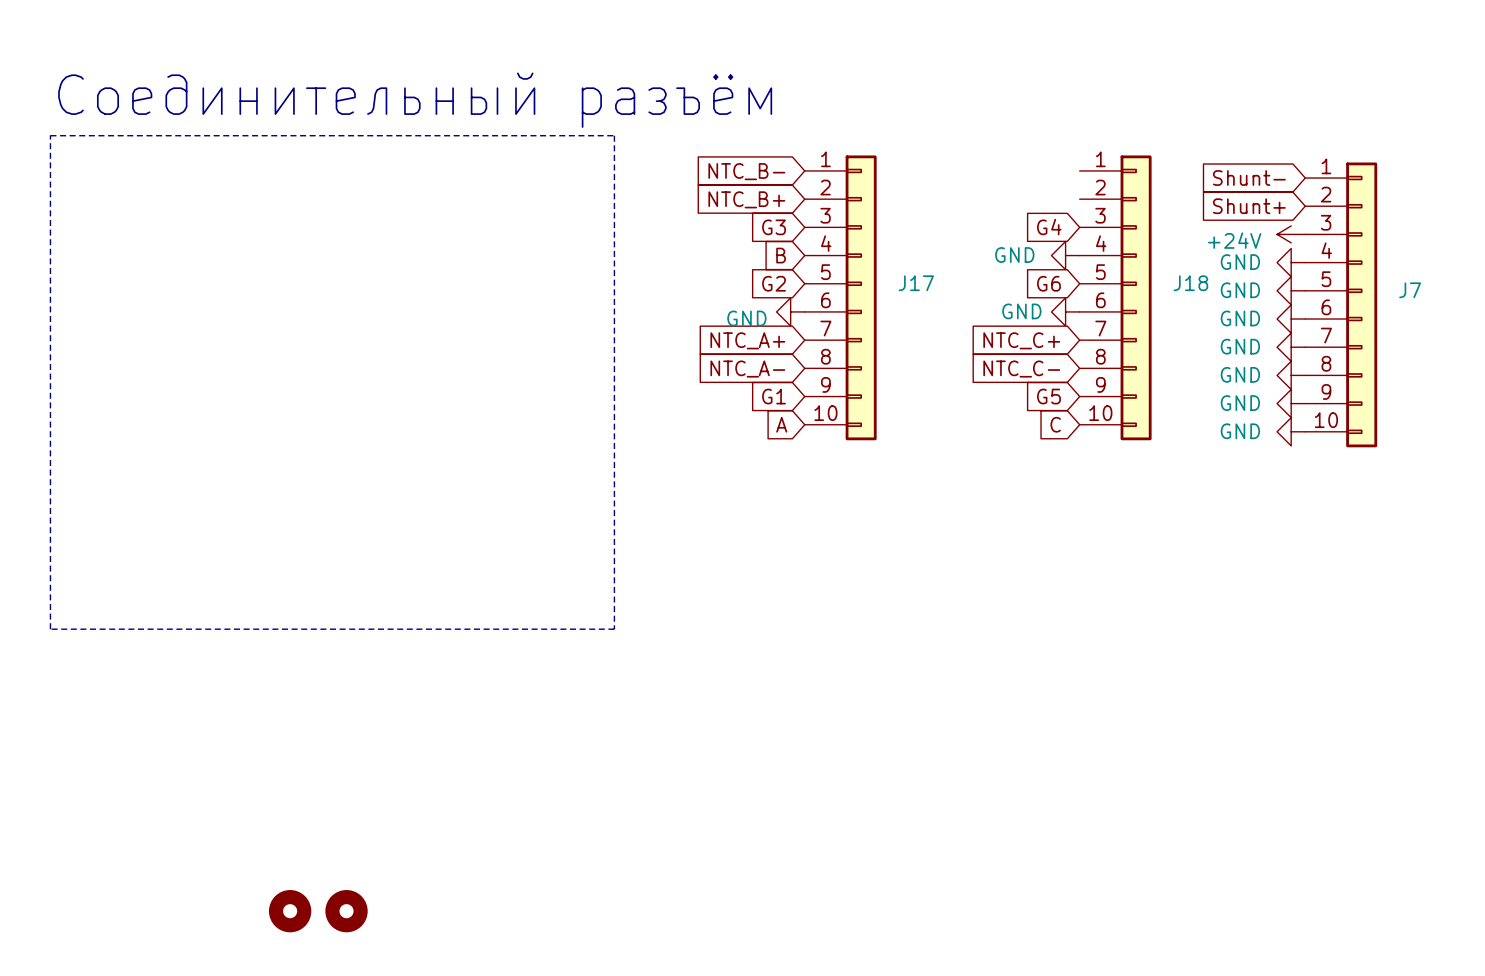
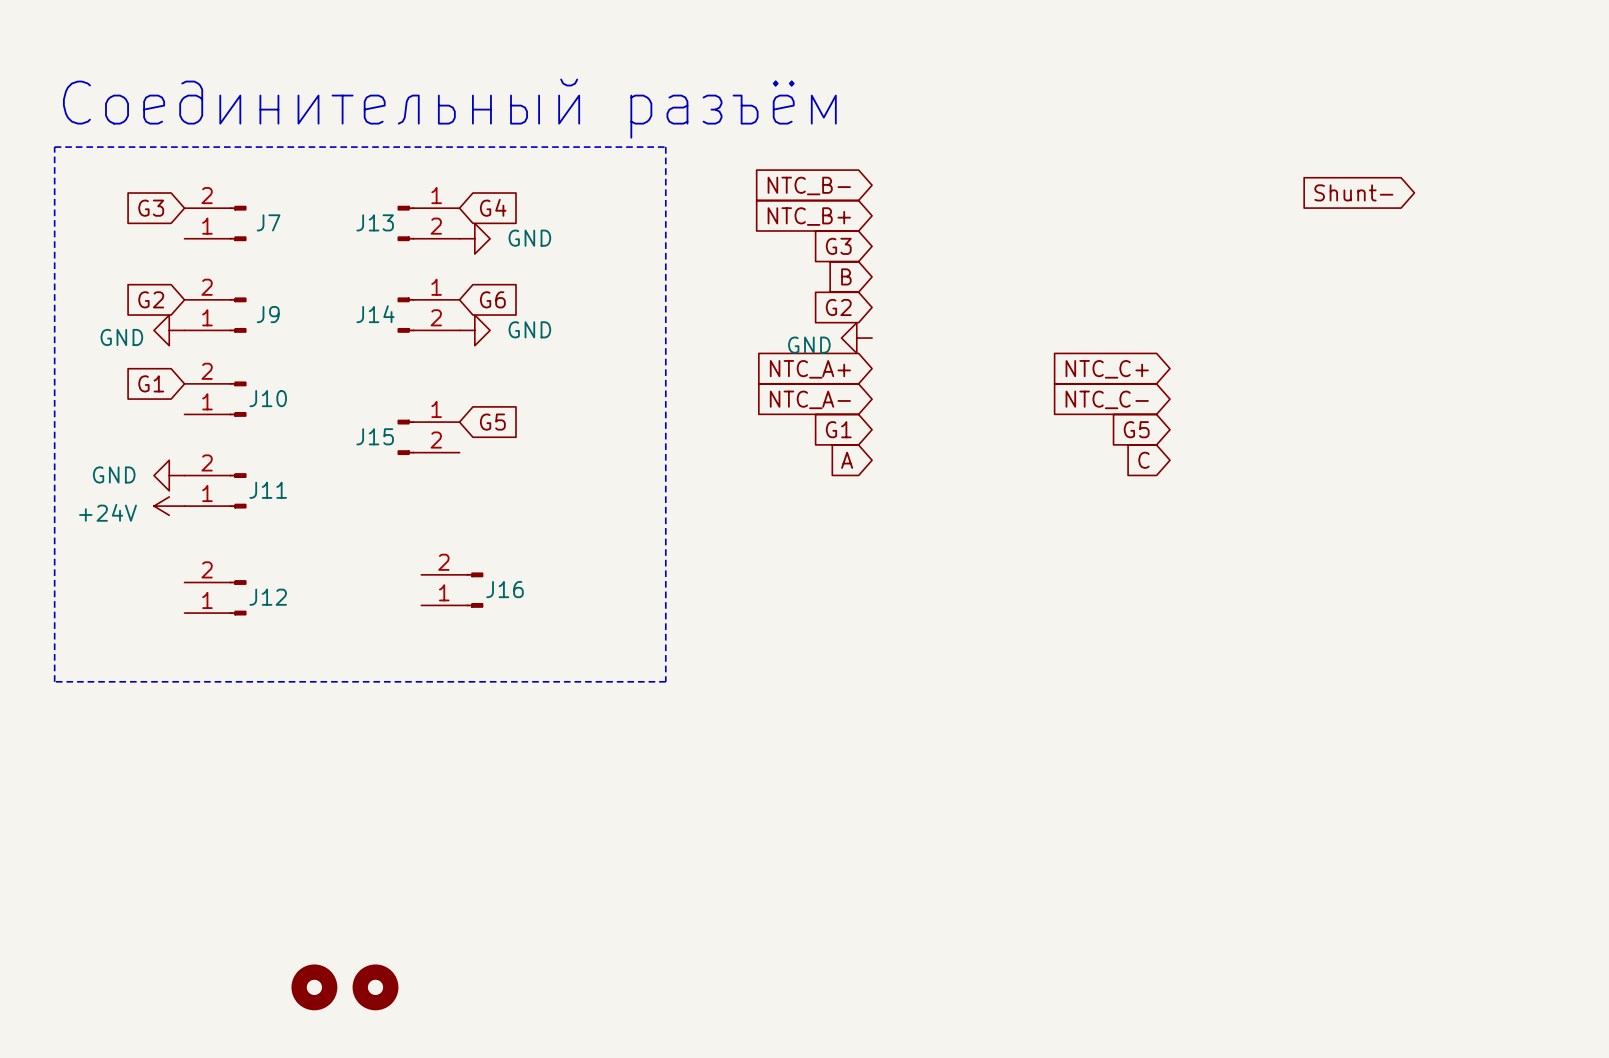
J7 symbol: [1305, 162, 1378, 448] -> [184, 205, 247, 242]
global label: none -> G4 (493, 207)
global label: none -> G3 (151, 208)
J13: none -> (428, 223)
global label: Shunt+ (1249, 206) -> none
power symbol: none -> GND (474, 238)
global label: G4 (1049, 227) -> none
power symbol: +24V (1291, 234) -> none
power symbol: GND (1065, 255) -> none
power symbol: GND (1291, 262) -> none
global label: none -> G2 (151, 299)
global label: none -> G6 (492, 299)
global label: G6 (1048, 283) -> none
J9: none -> (215, 315)
J14: none -> (428, 315)
power symbol: GND (1291, 290) -> none
J7 name position: J7 (1410, 290) -> J7 (268, 222)
J17: (840, 297) -> none
J18: (1115, 297) -> none
power symbol: none -> GND (169, 330)
power symbol: none -> GND (474, 330)
power symbol: GND (1065, 311) -> none
power symbol: GND (1291, 319) -> none
power symbol: GND (1291, 347) -> none
global label: none -> G1 (151, 383)
J10: none -> (215, 399)
power symbol: GND (1291, 375) -> none
global label: none -> G5 (492, 422)
J15: none -> (428, 437)
power symbol: GND (1291, 403) -> none
power symbol: GND (1291, 431) -> none
power symbol: none -> GND (169, 475)
J11: none -> (215, 490)
power symbol: none -> +24V (169, 506)
J16: none -> (452, 590)
J12: none -> (215, 597)

